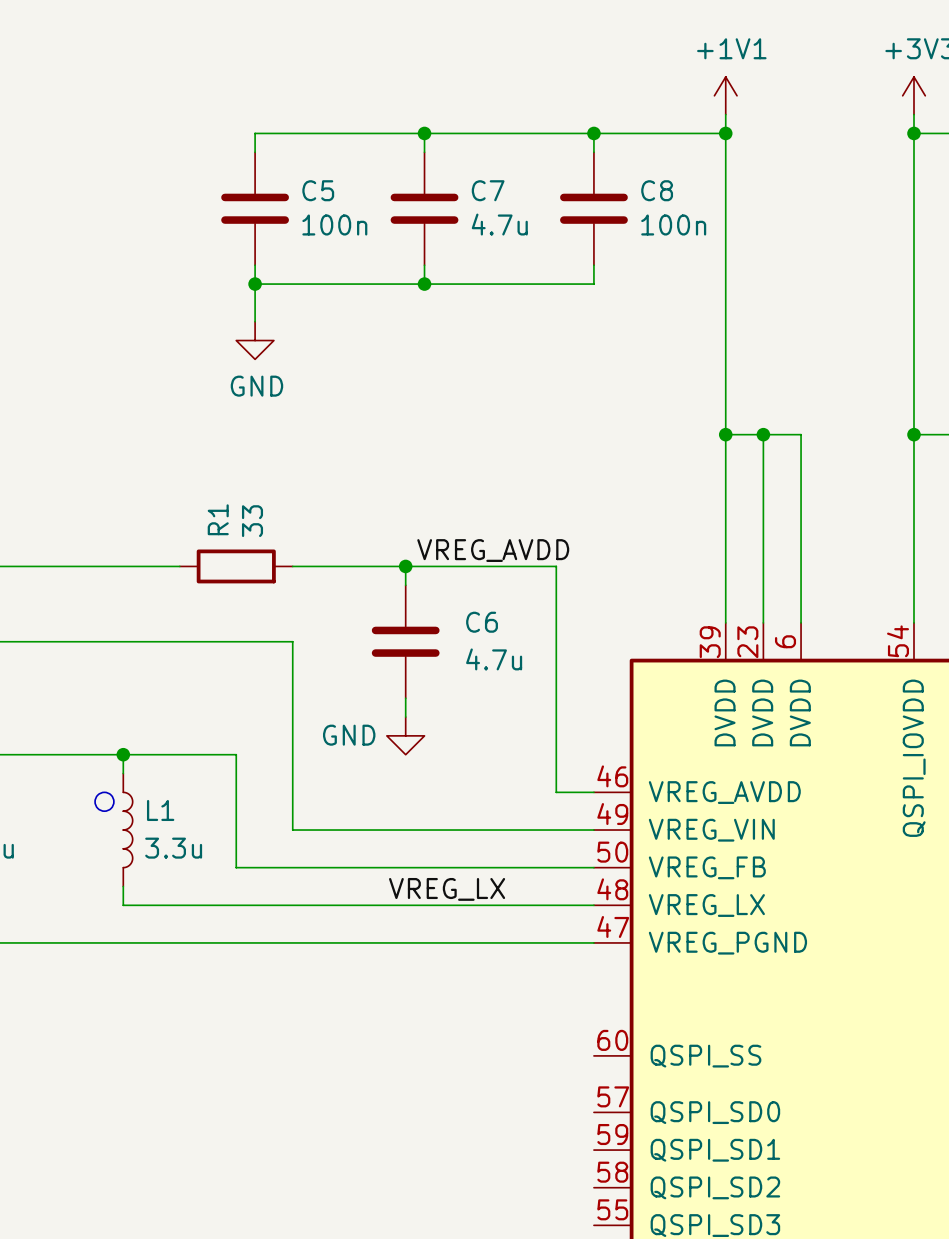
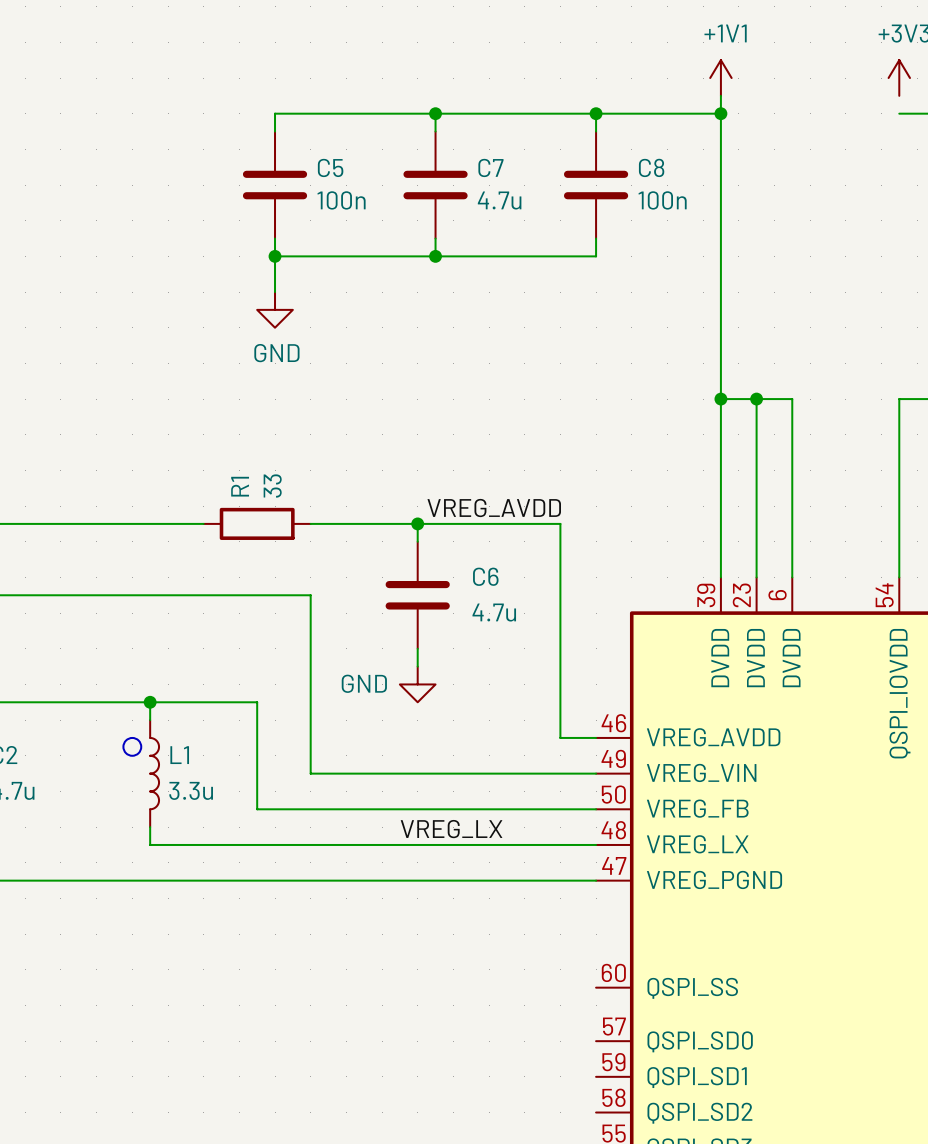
wire: (913, 114) (913, 434) -> none
junction: (913, 133) -> none
junction: (913, 434) -> none

